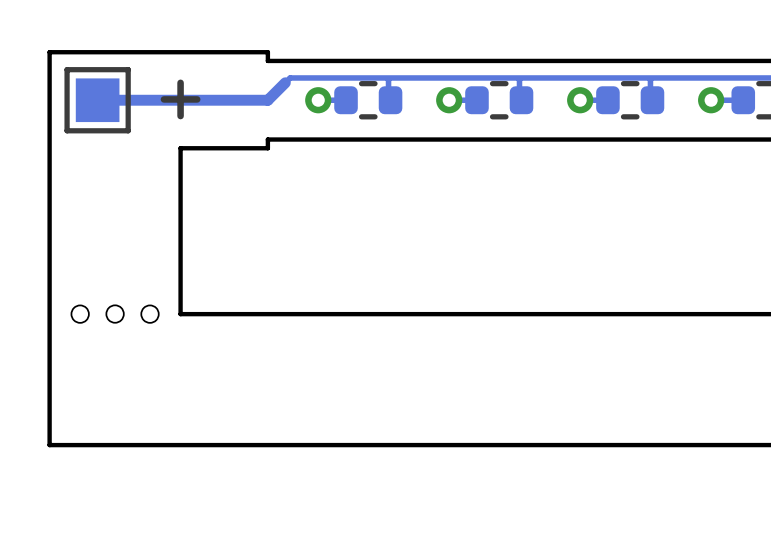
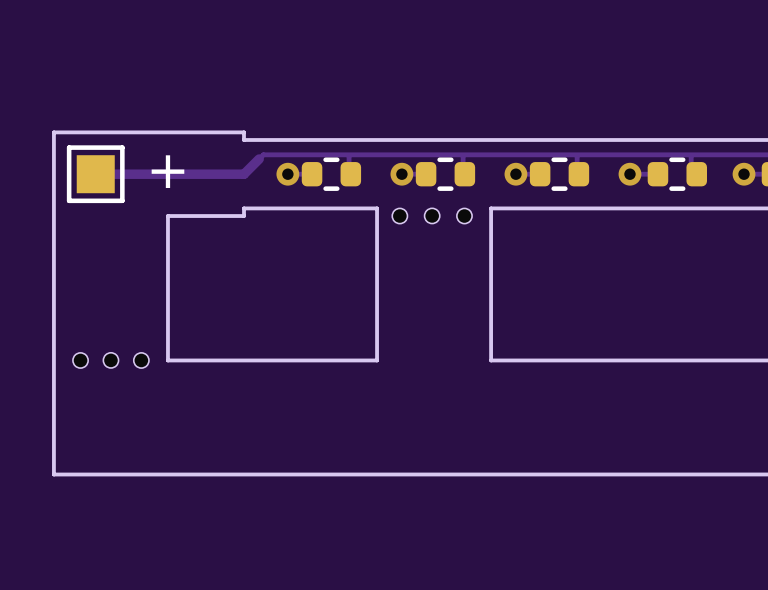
board edge: (551, 139) (420, 139) -> (491, 208) (491, 360)
part: none -> (399, 216)
part: none -> (432, 215)
part: none -> (464, 216)
board edge: (551, 314) (420, 314) -> (377, 208) (377, 360)

